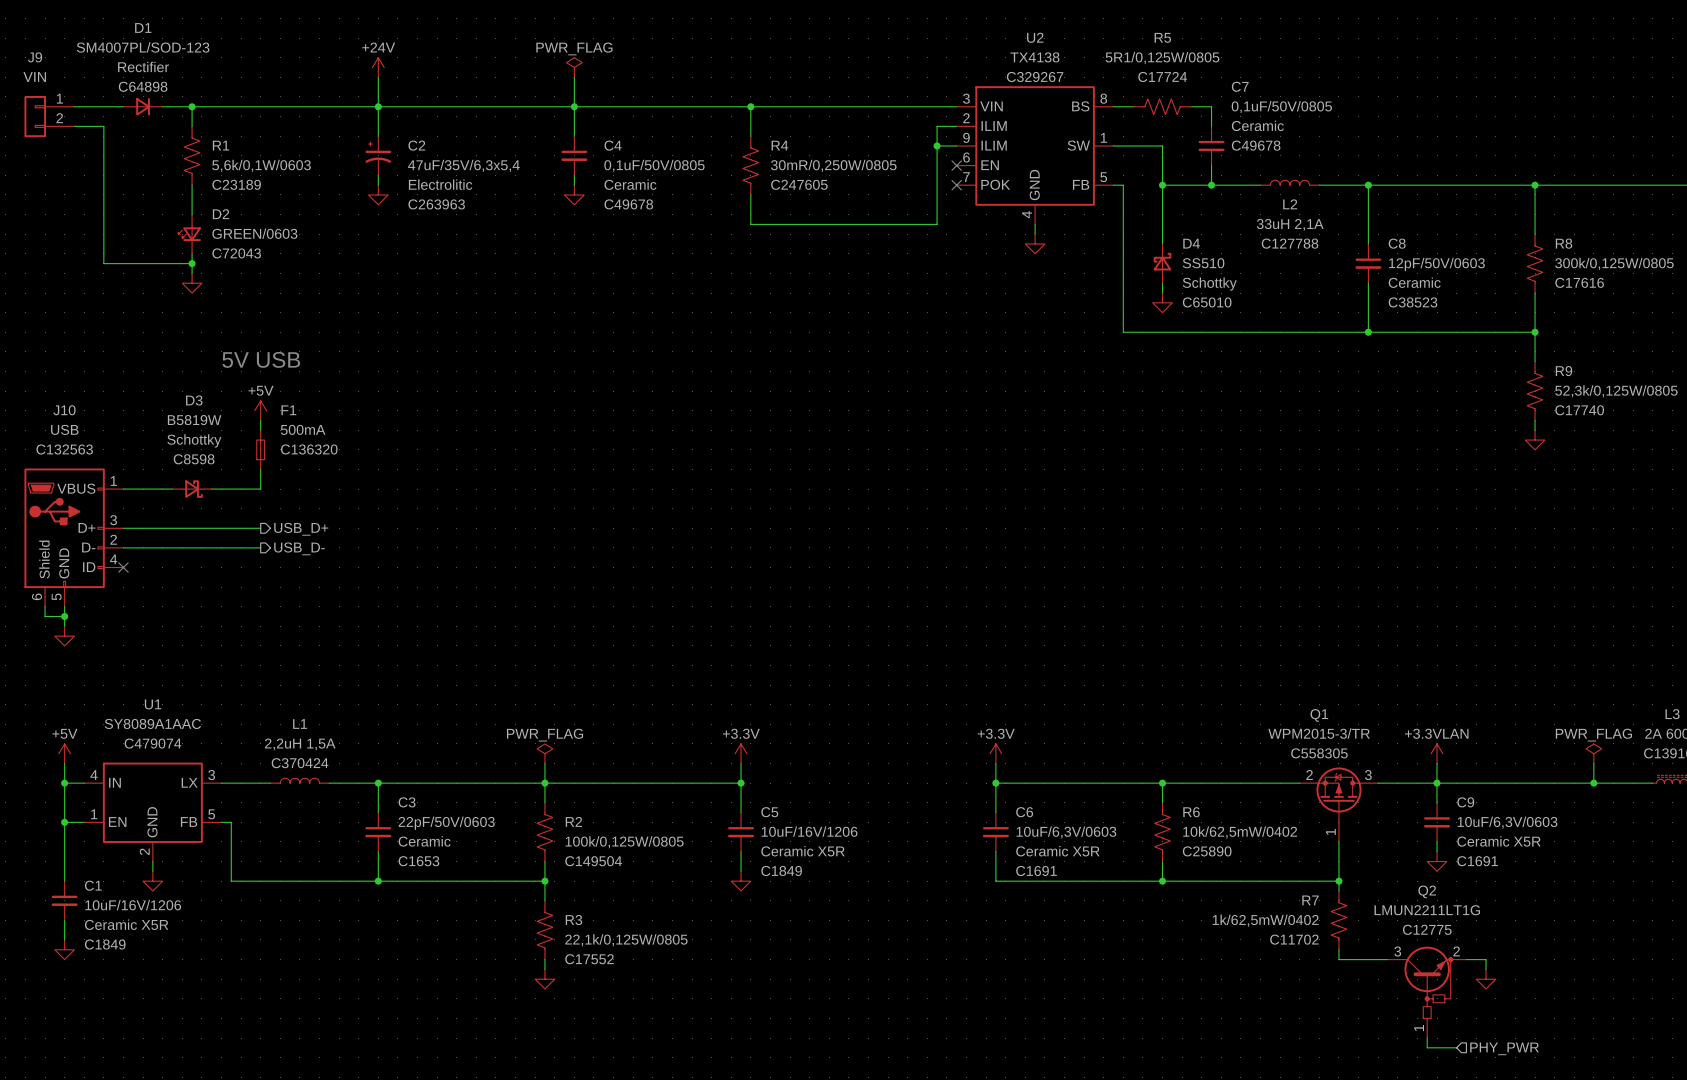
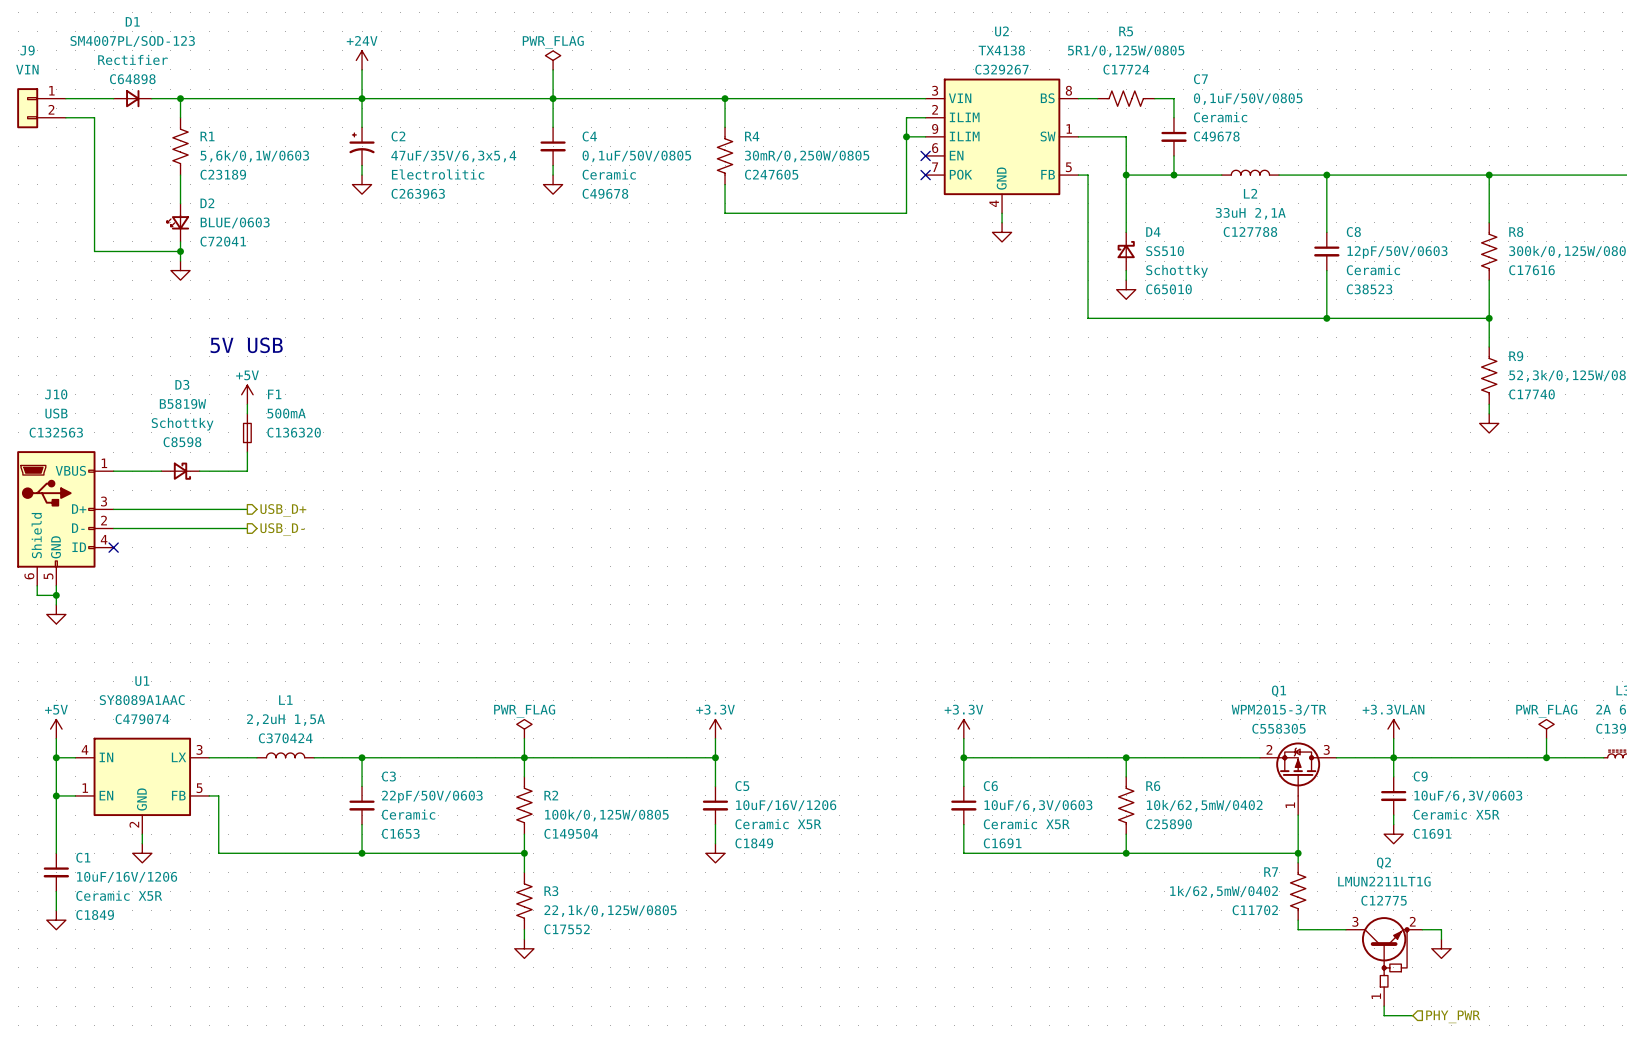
D2 value: GREEN/0603 (254, 233) -> BLUE/0603 (235, 222)
D2 text: C72043 (236, 253) -> C72041 (223, 241)

